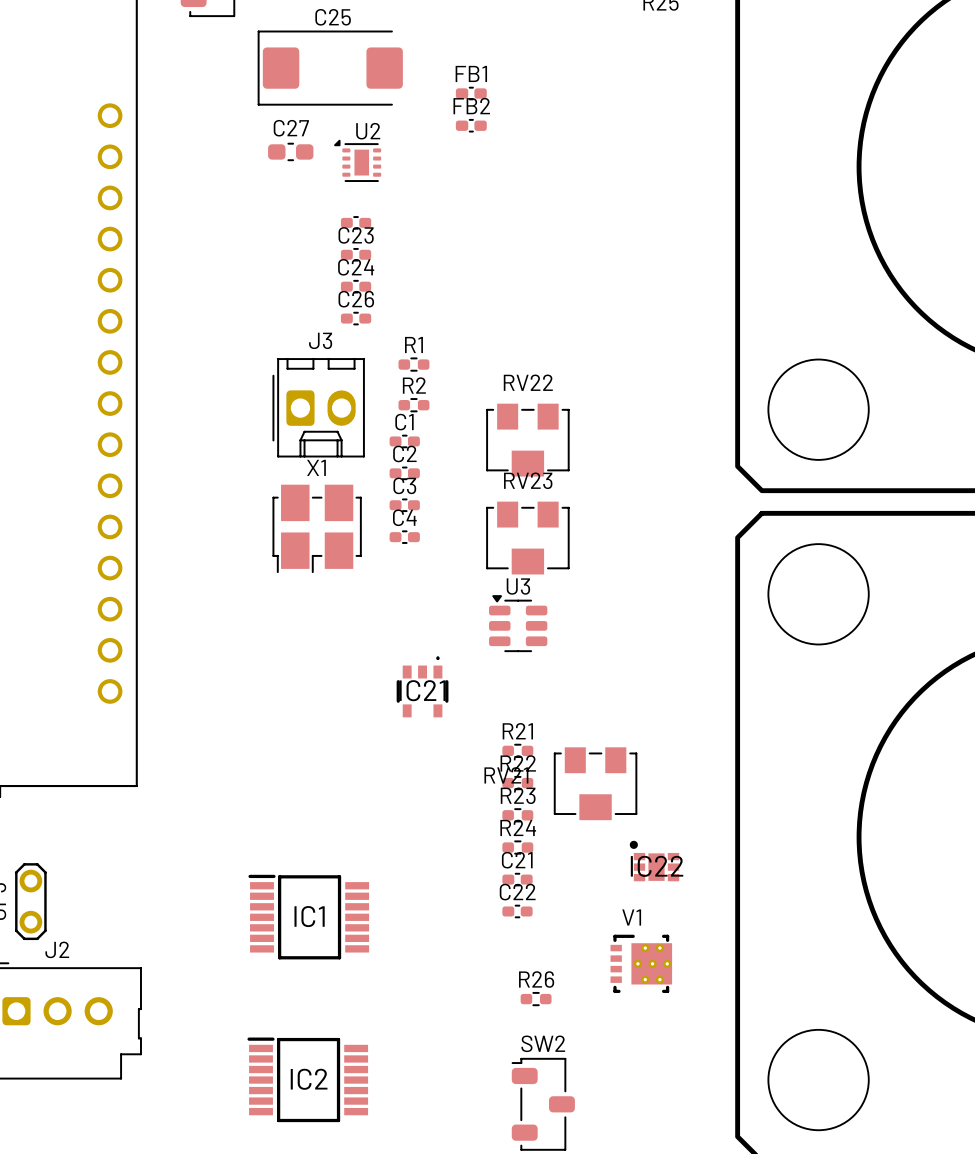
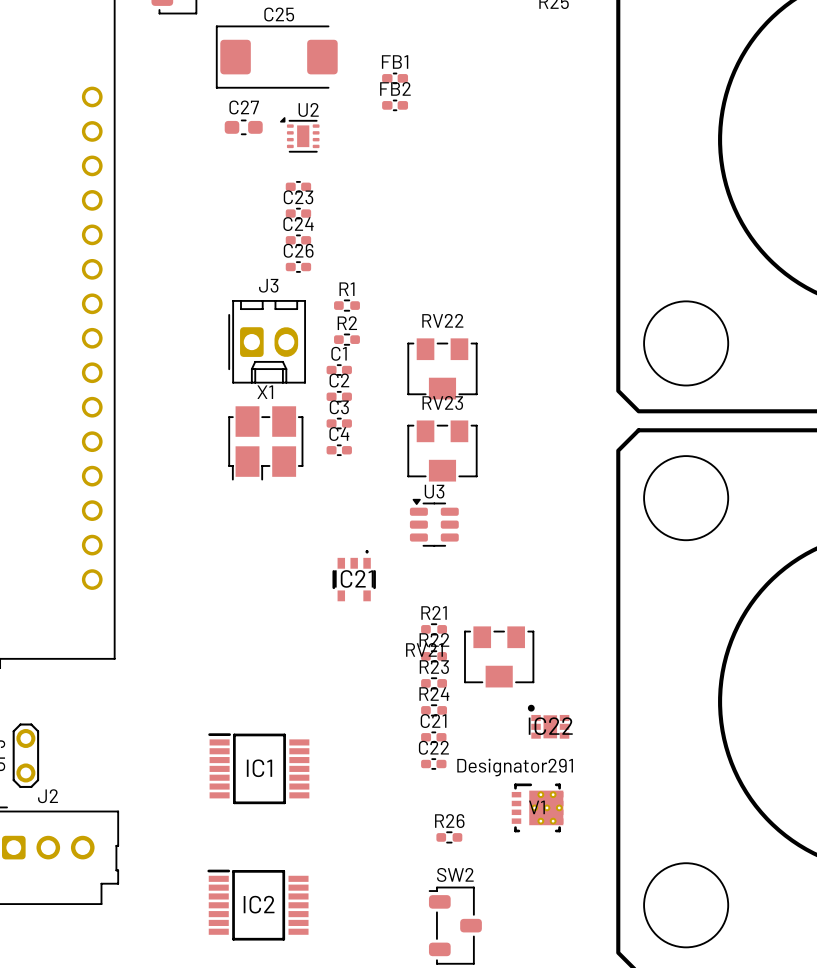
V1 text: none -> Designator291 (515, 767)
V1 name position: V1 (631, 917) -> V1 (536, 807)

